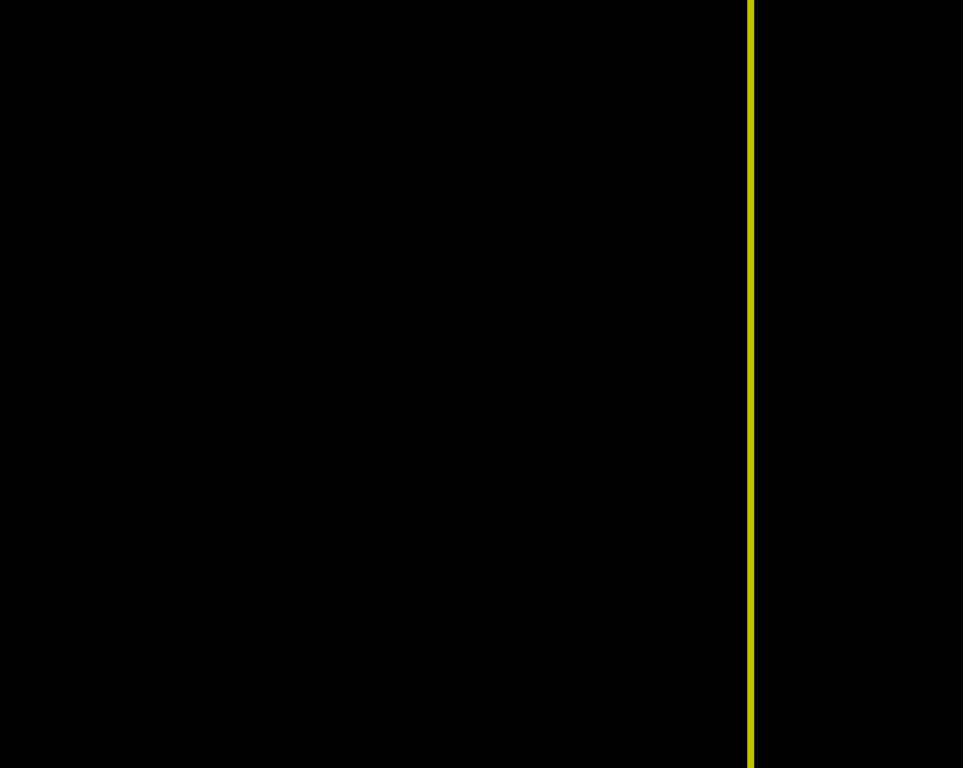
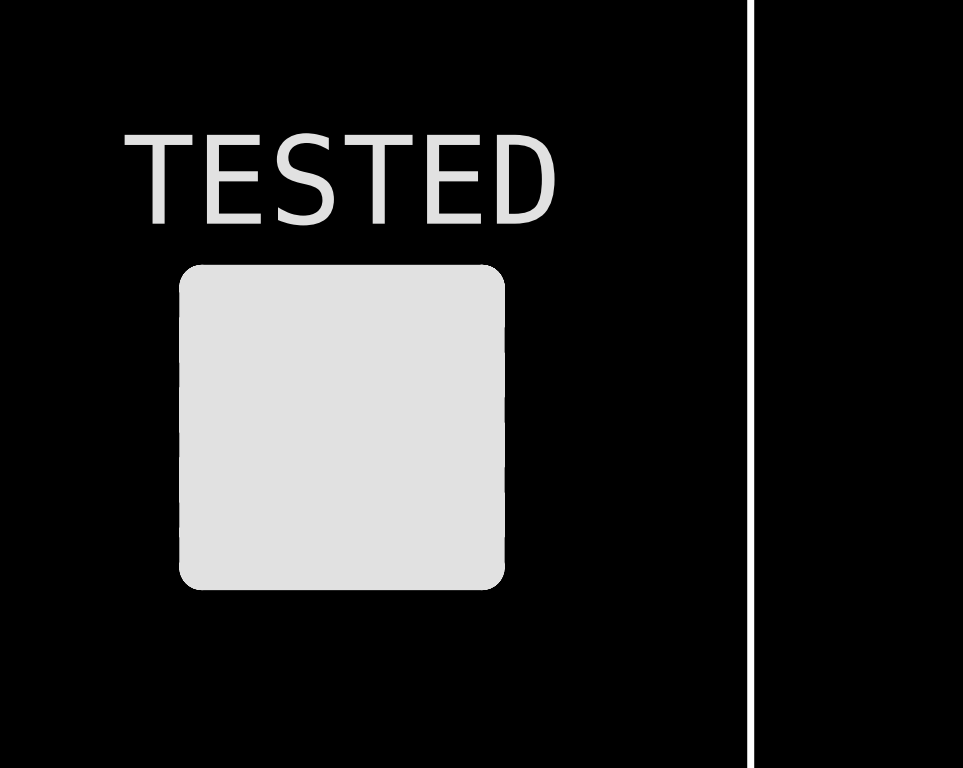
TESTED: none -> (341, 427)

